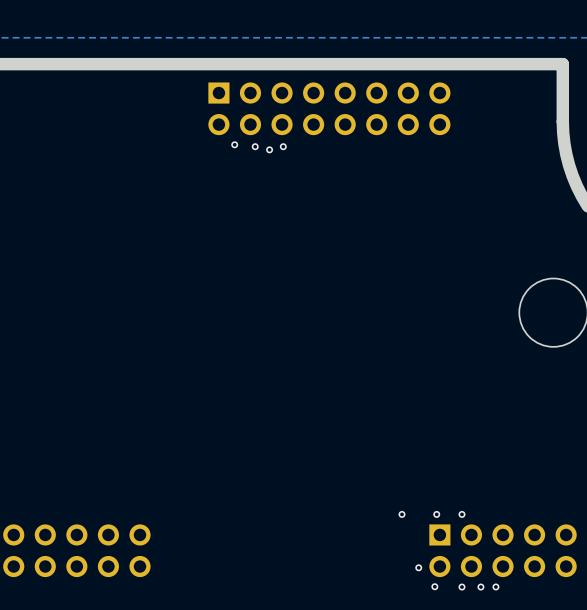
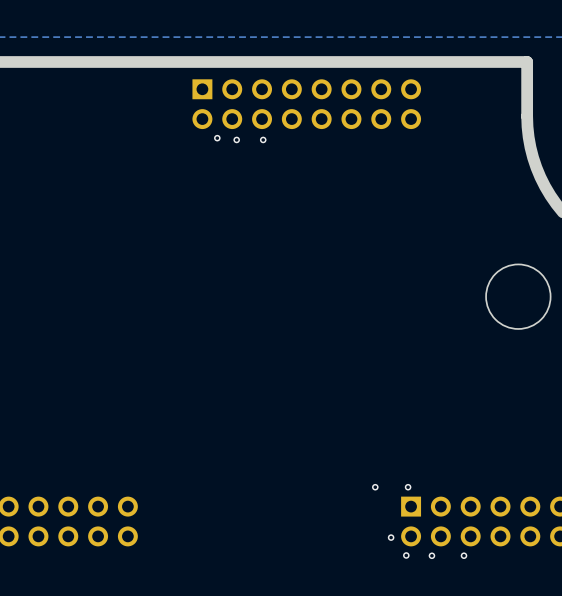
via: (269, 149) -> none
via: (461, 514) -> none
via: (480, 587) -> none

